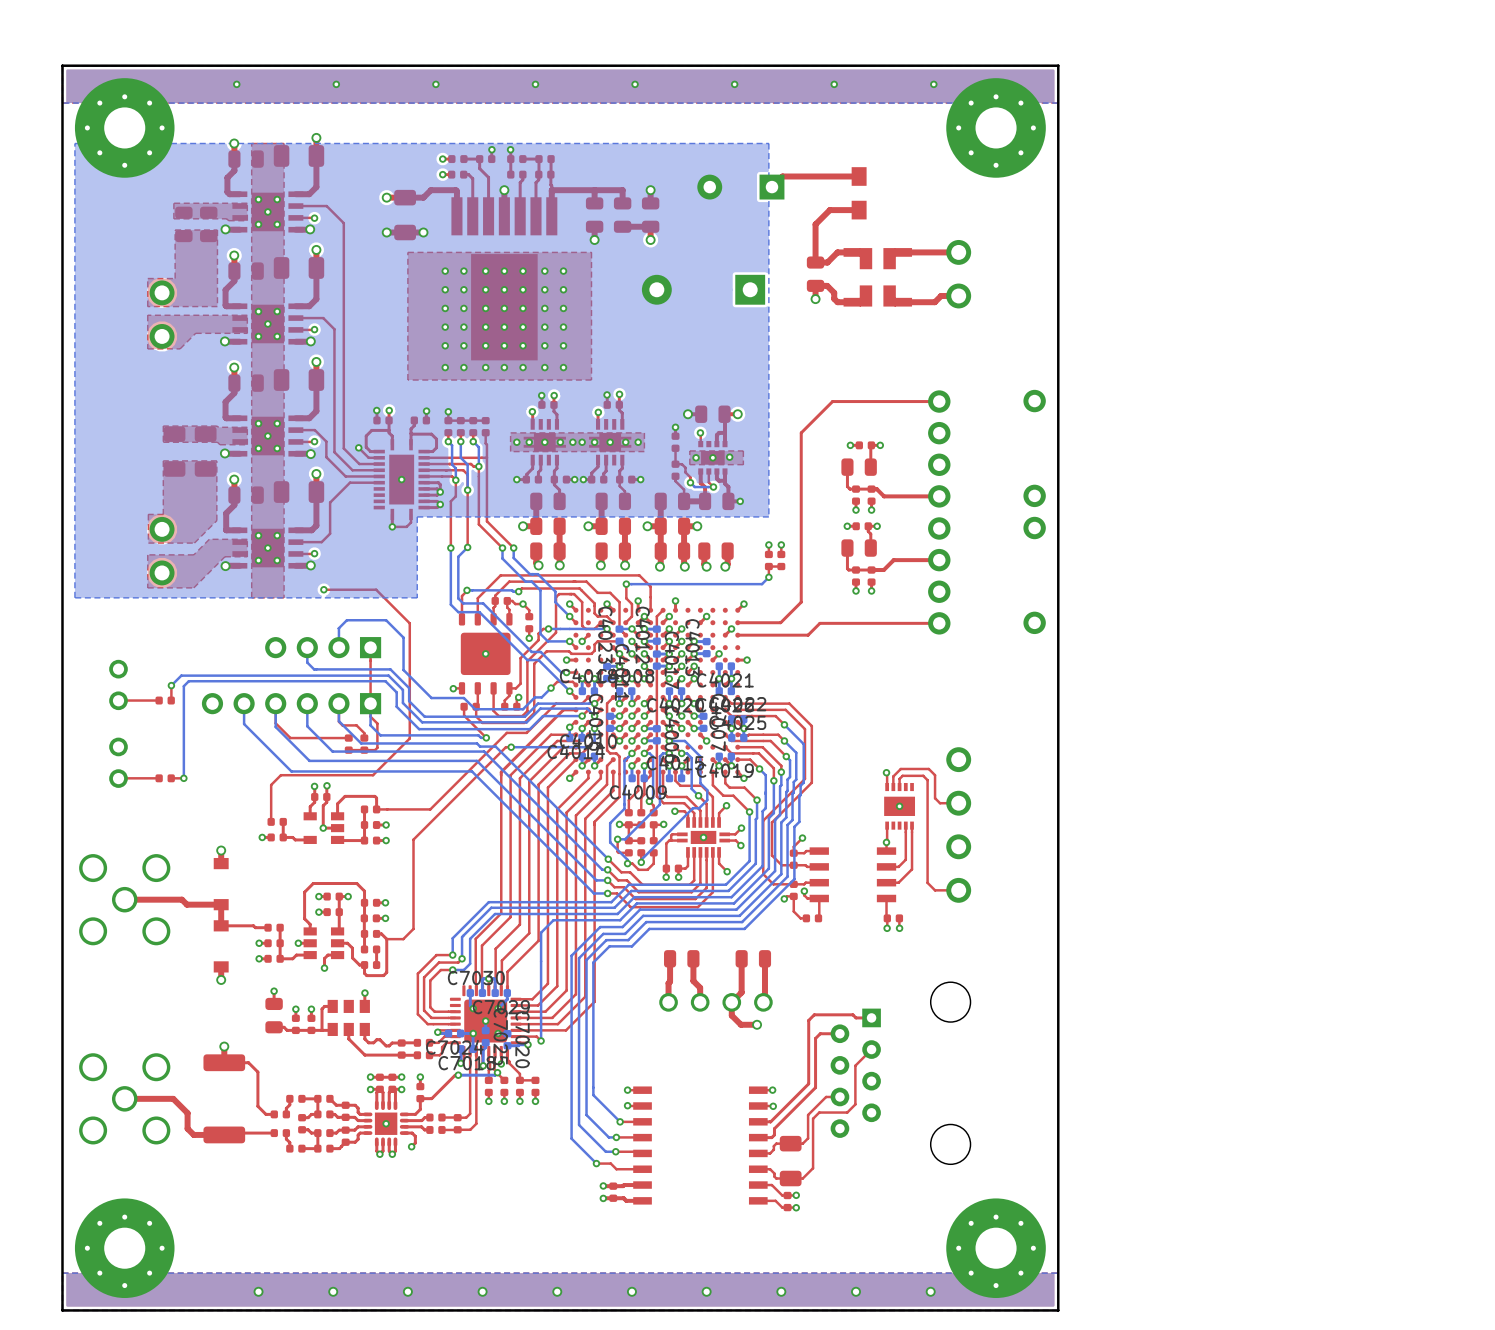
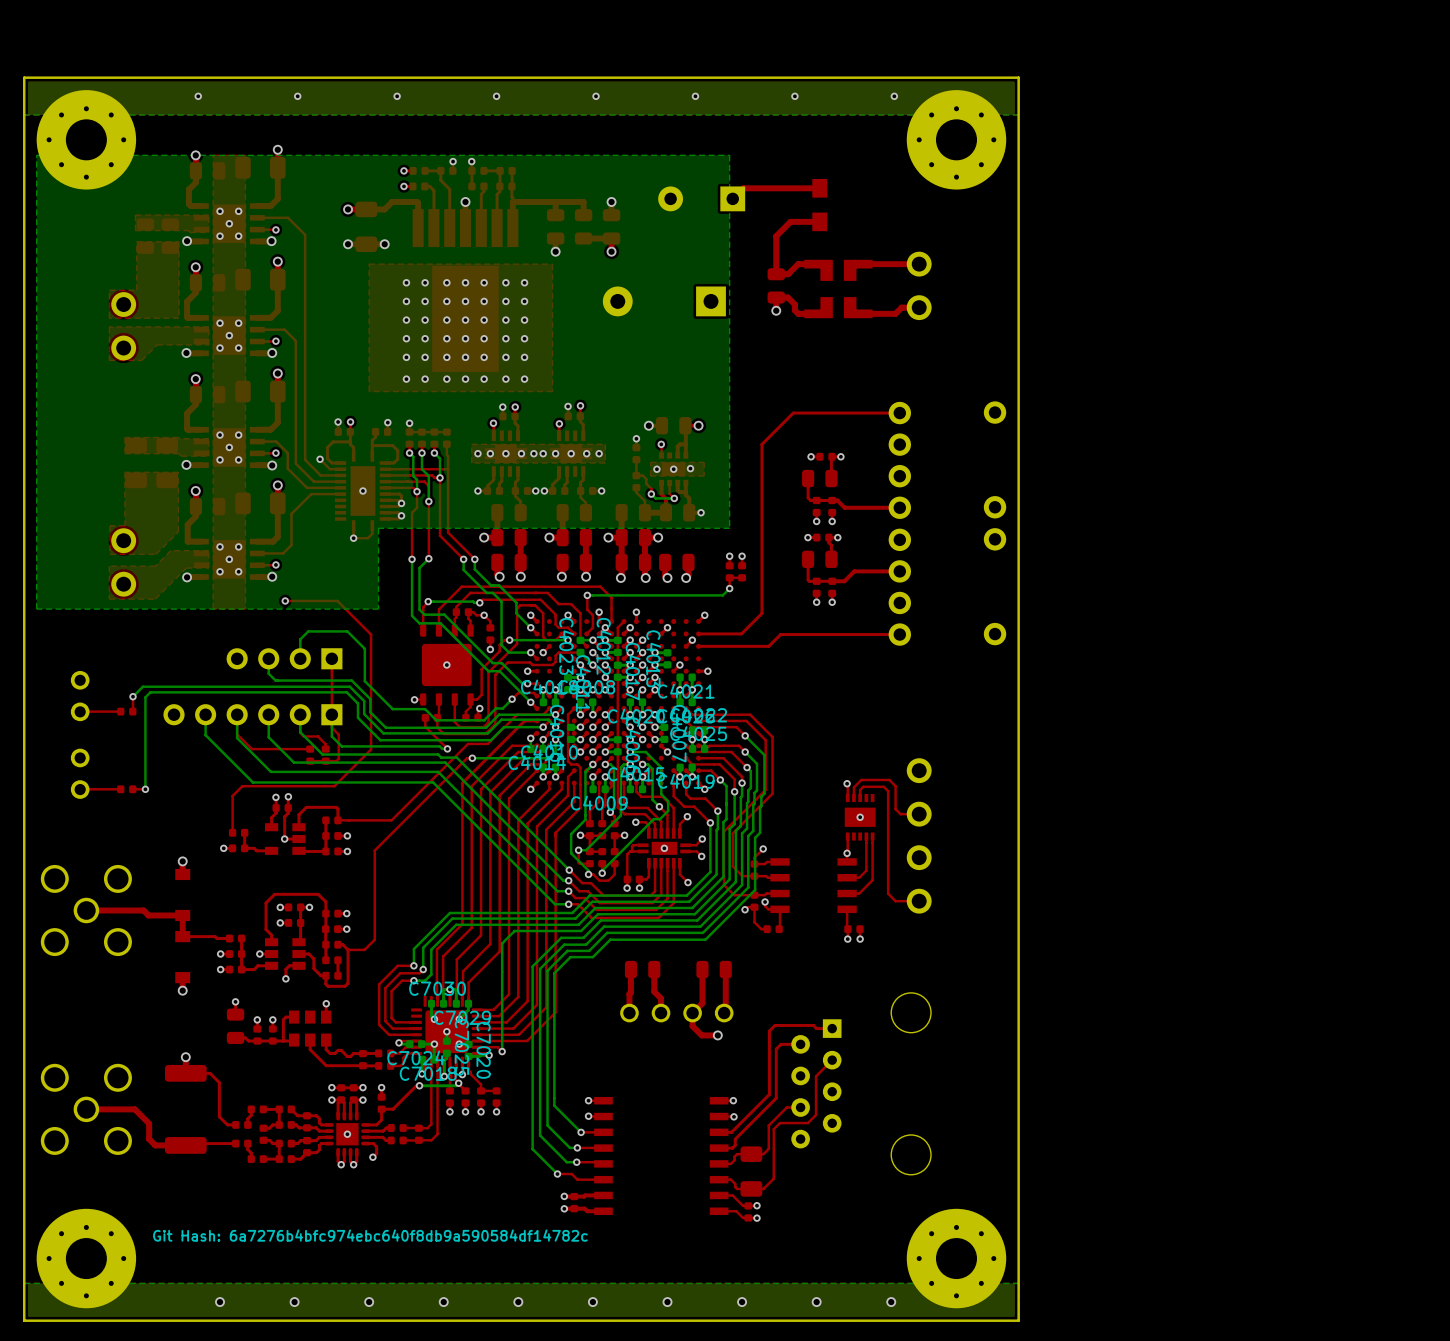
text: none -> Git Hash: 6a7276b4bfc974ebc640f8db9a590584df14782c (370, 1235)

